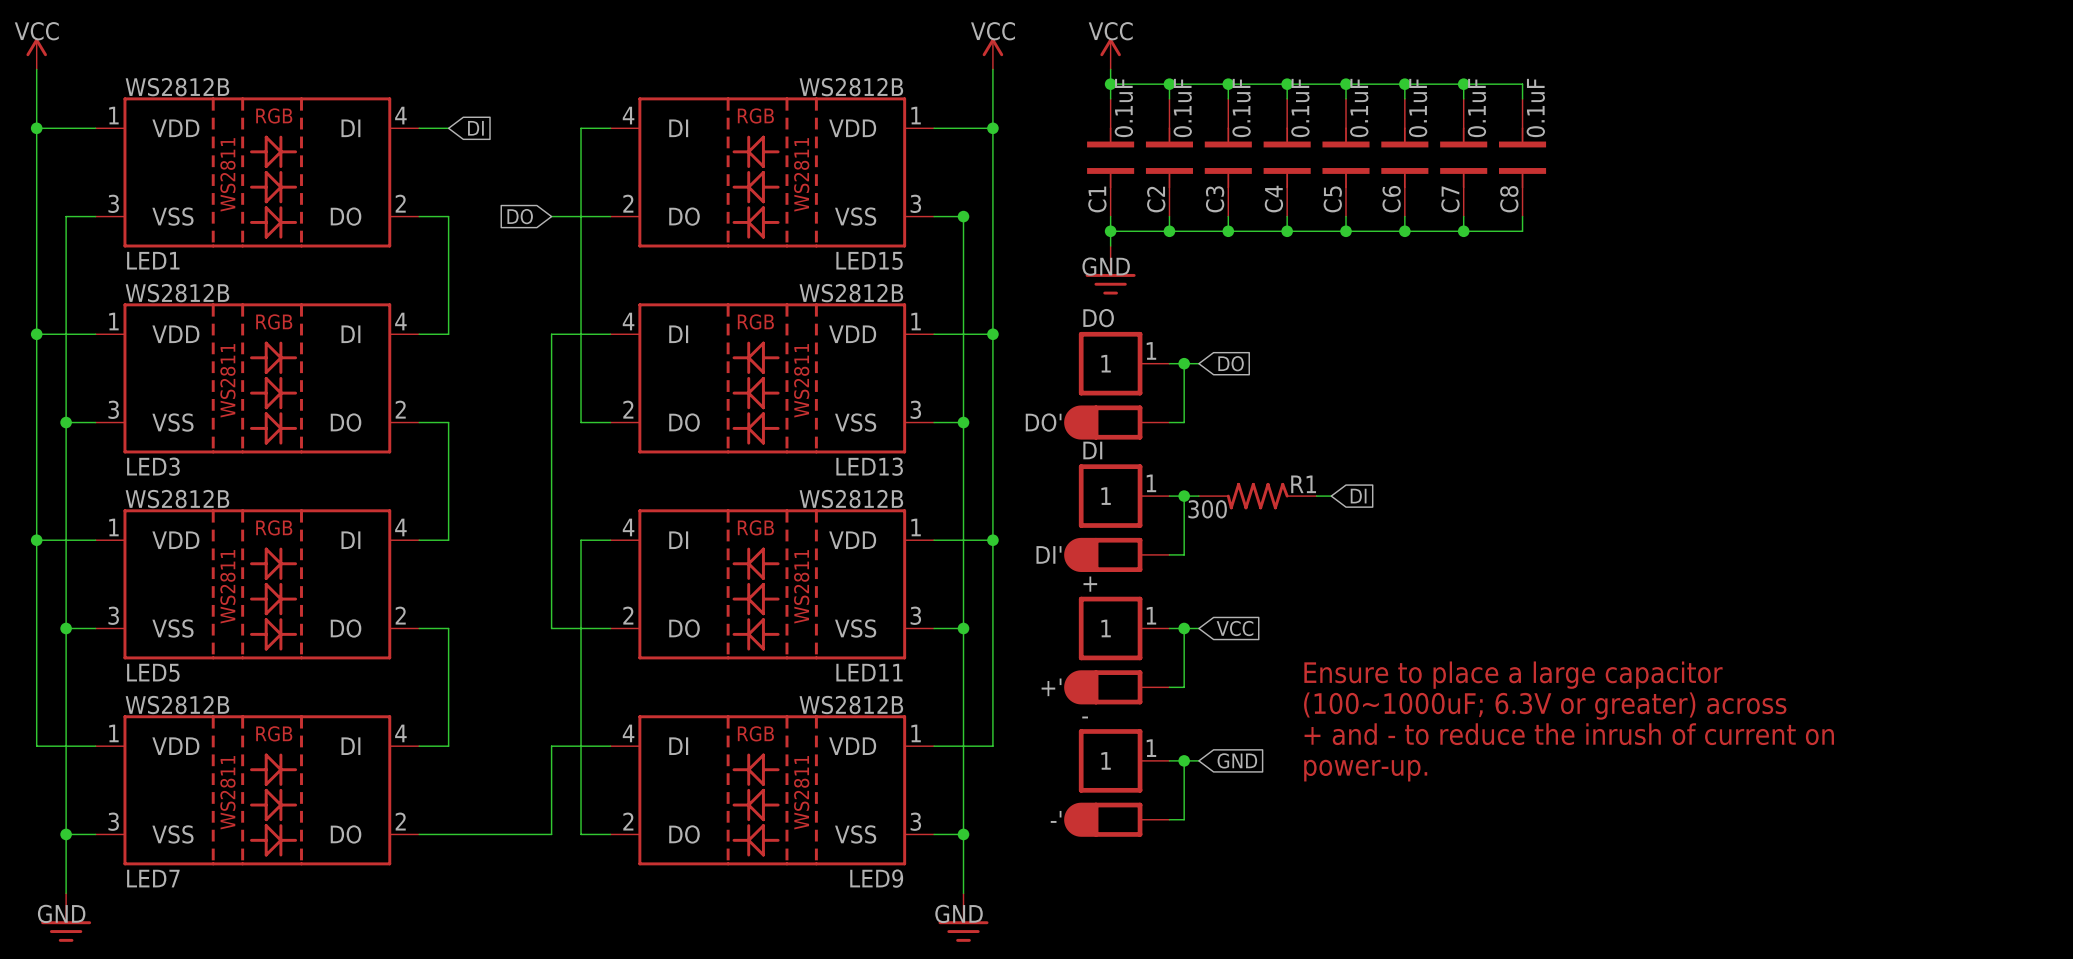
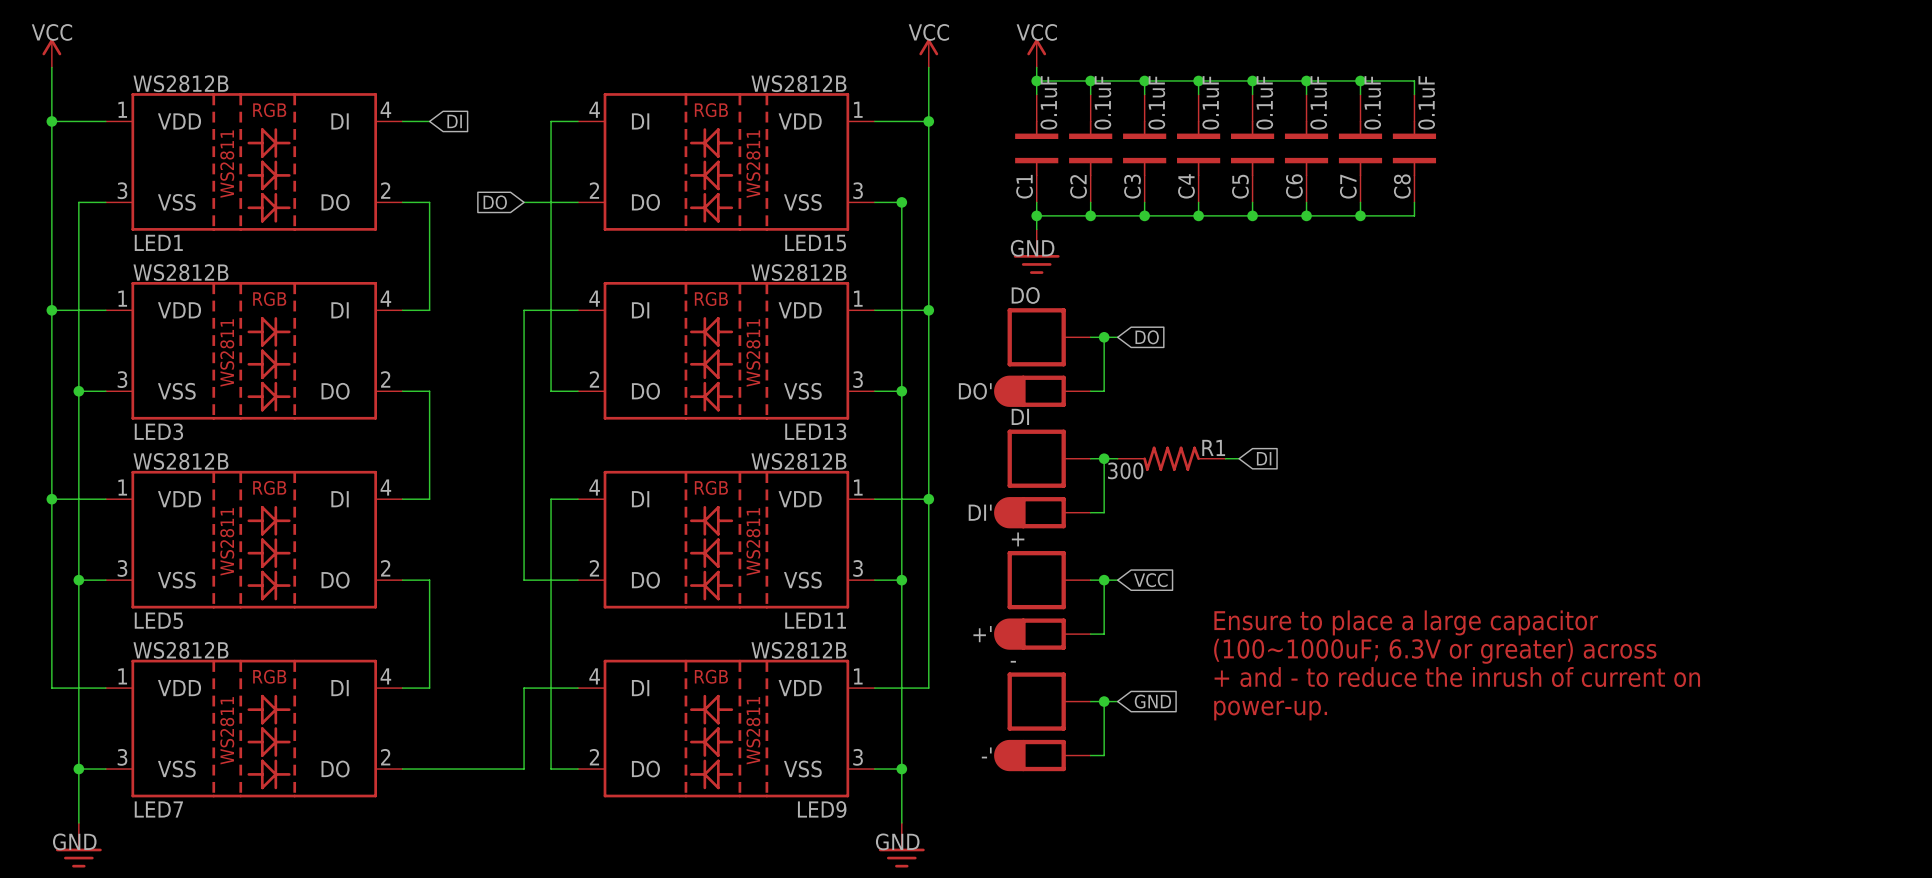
DO pin number: 1 (1151, 350) -> none
DO pin name: 1 (1106, 363) -> none
DI pin number: 1 (1151, 483) -> none
DI pin name: 1 (1106, 496) -> none
part pin number: 1 (1151, 615) -> none
part pin name: 1 (1106, 628) -> none
part pin number: 1 (1151, 748) -> none
part pin name: 1 (1106, 760) -> none

